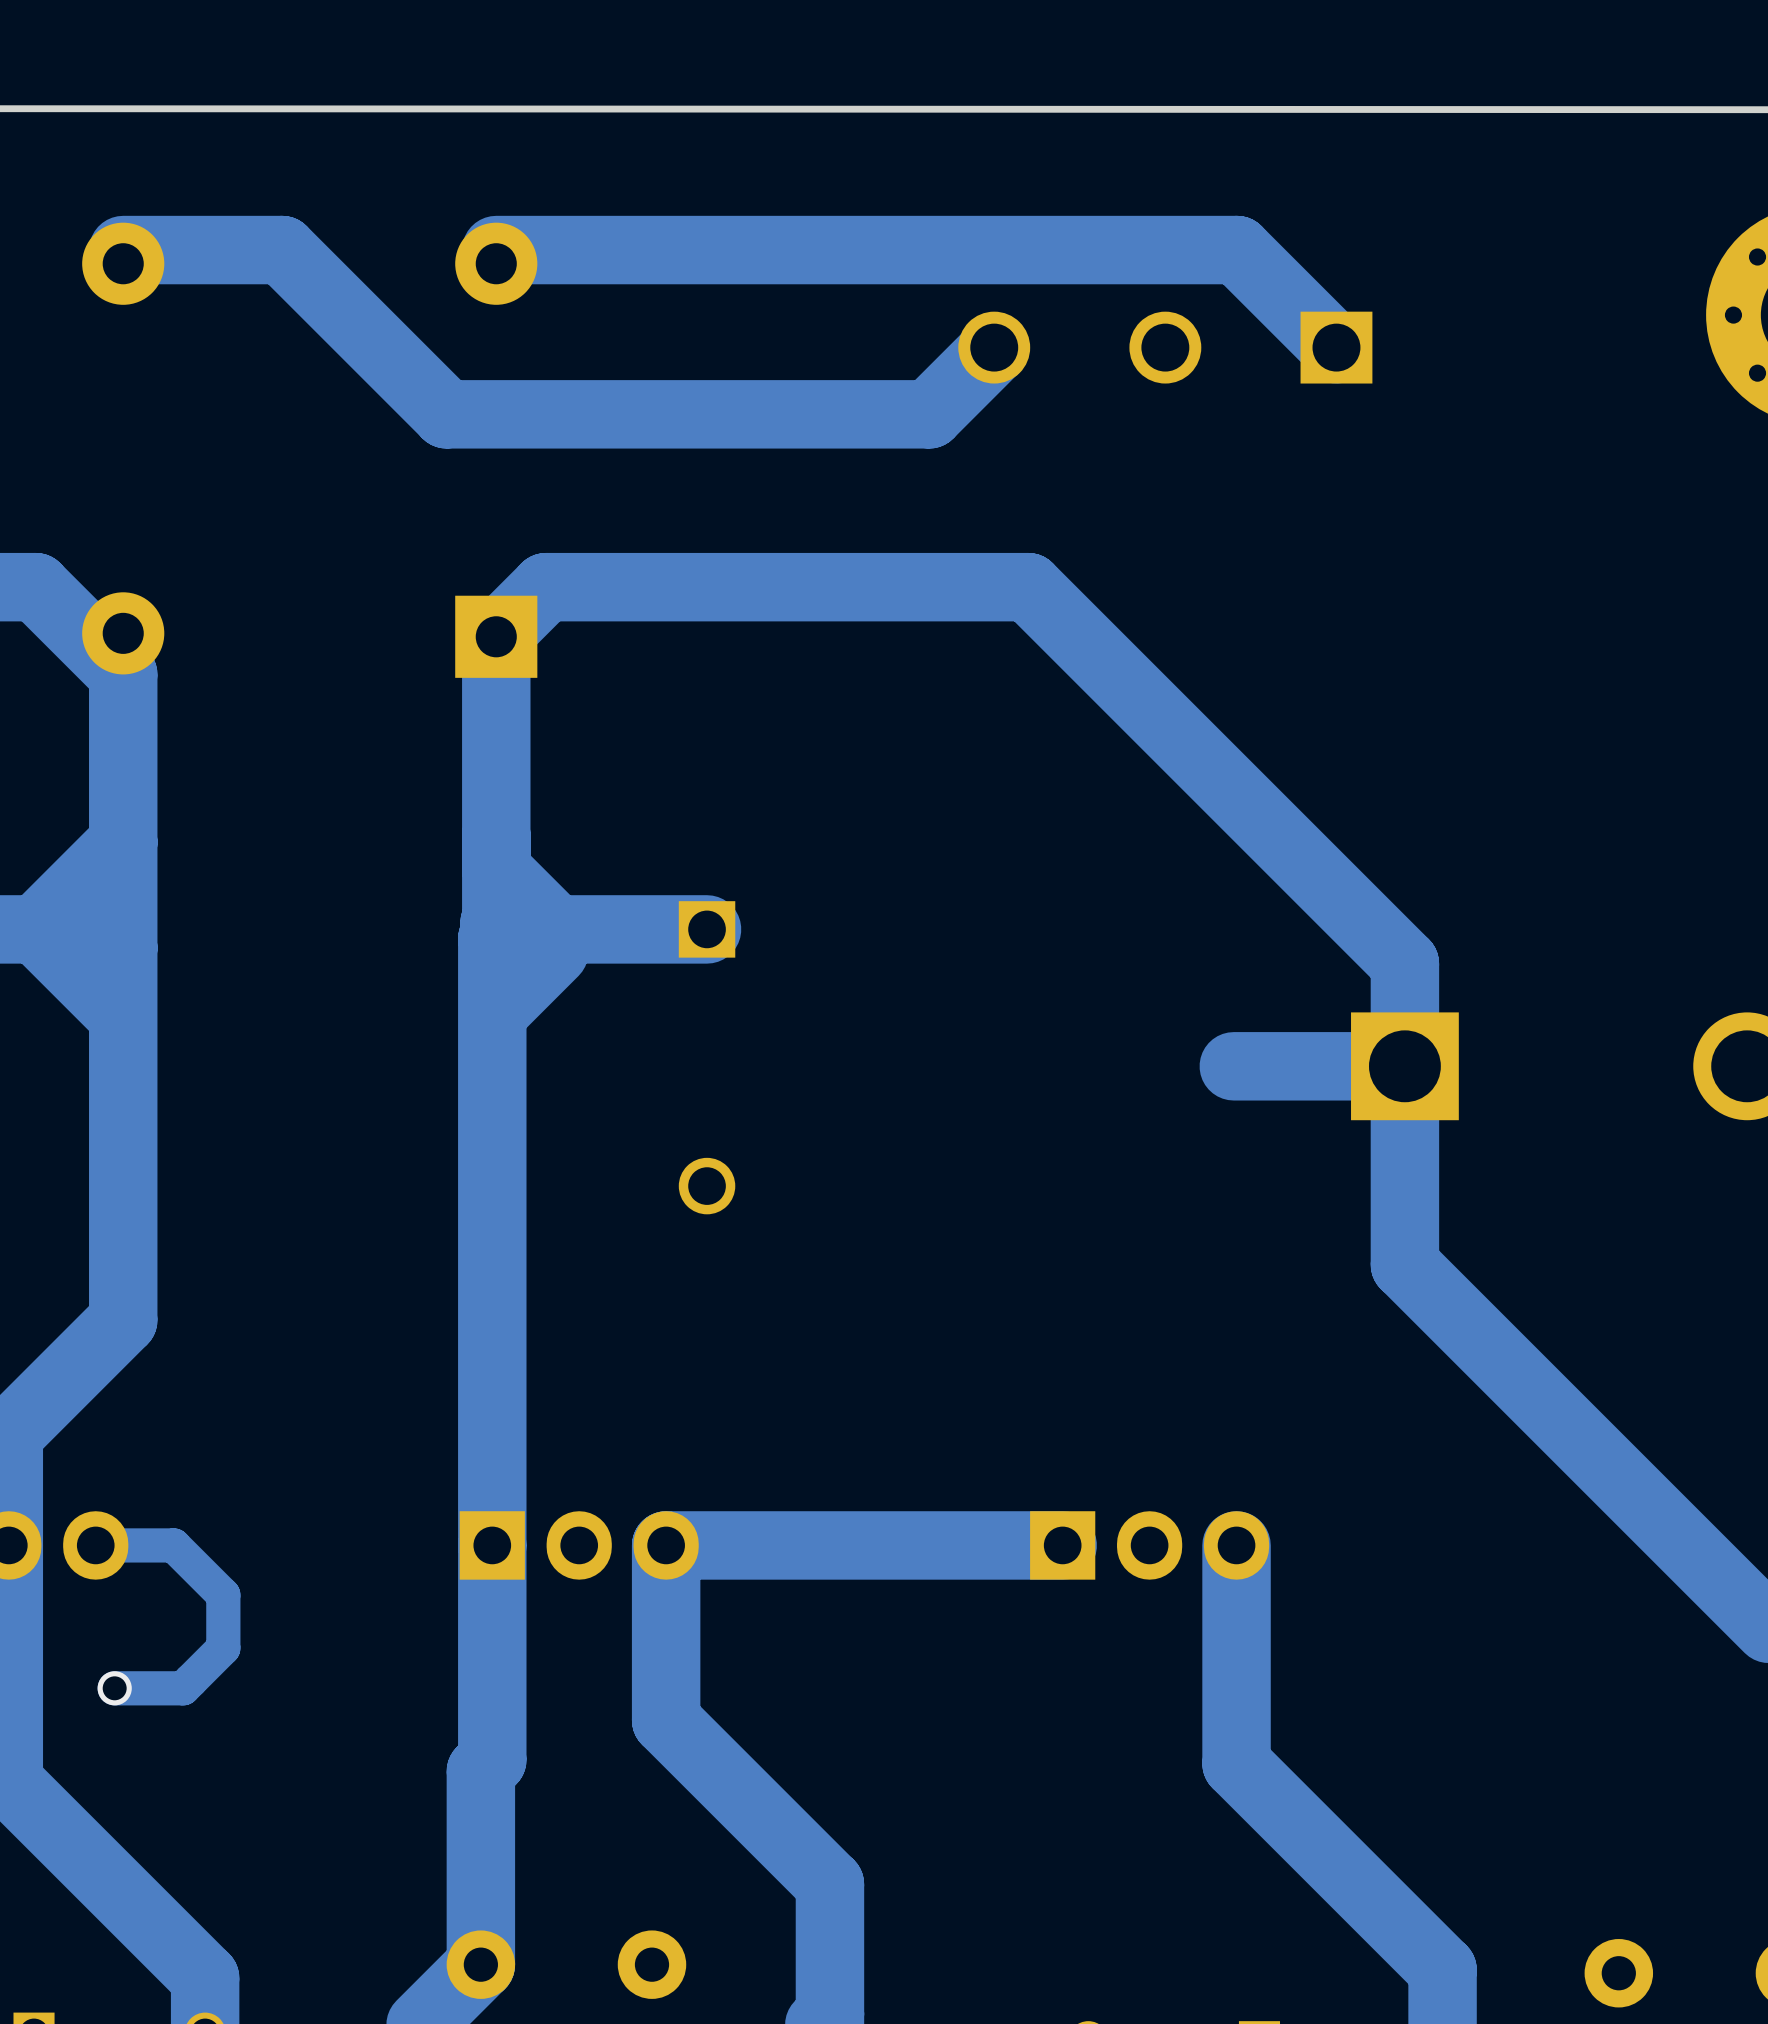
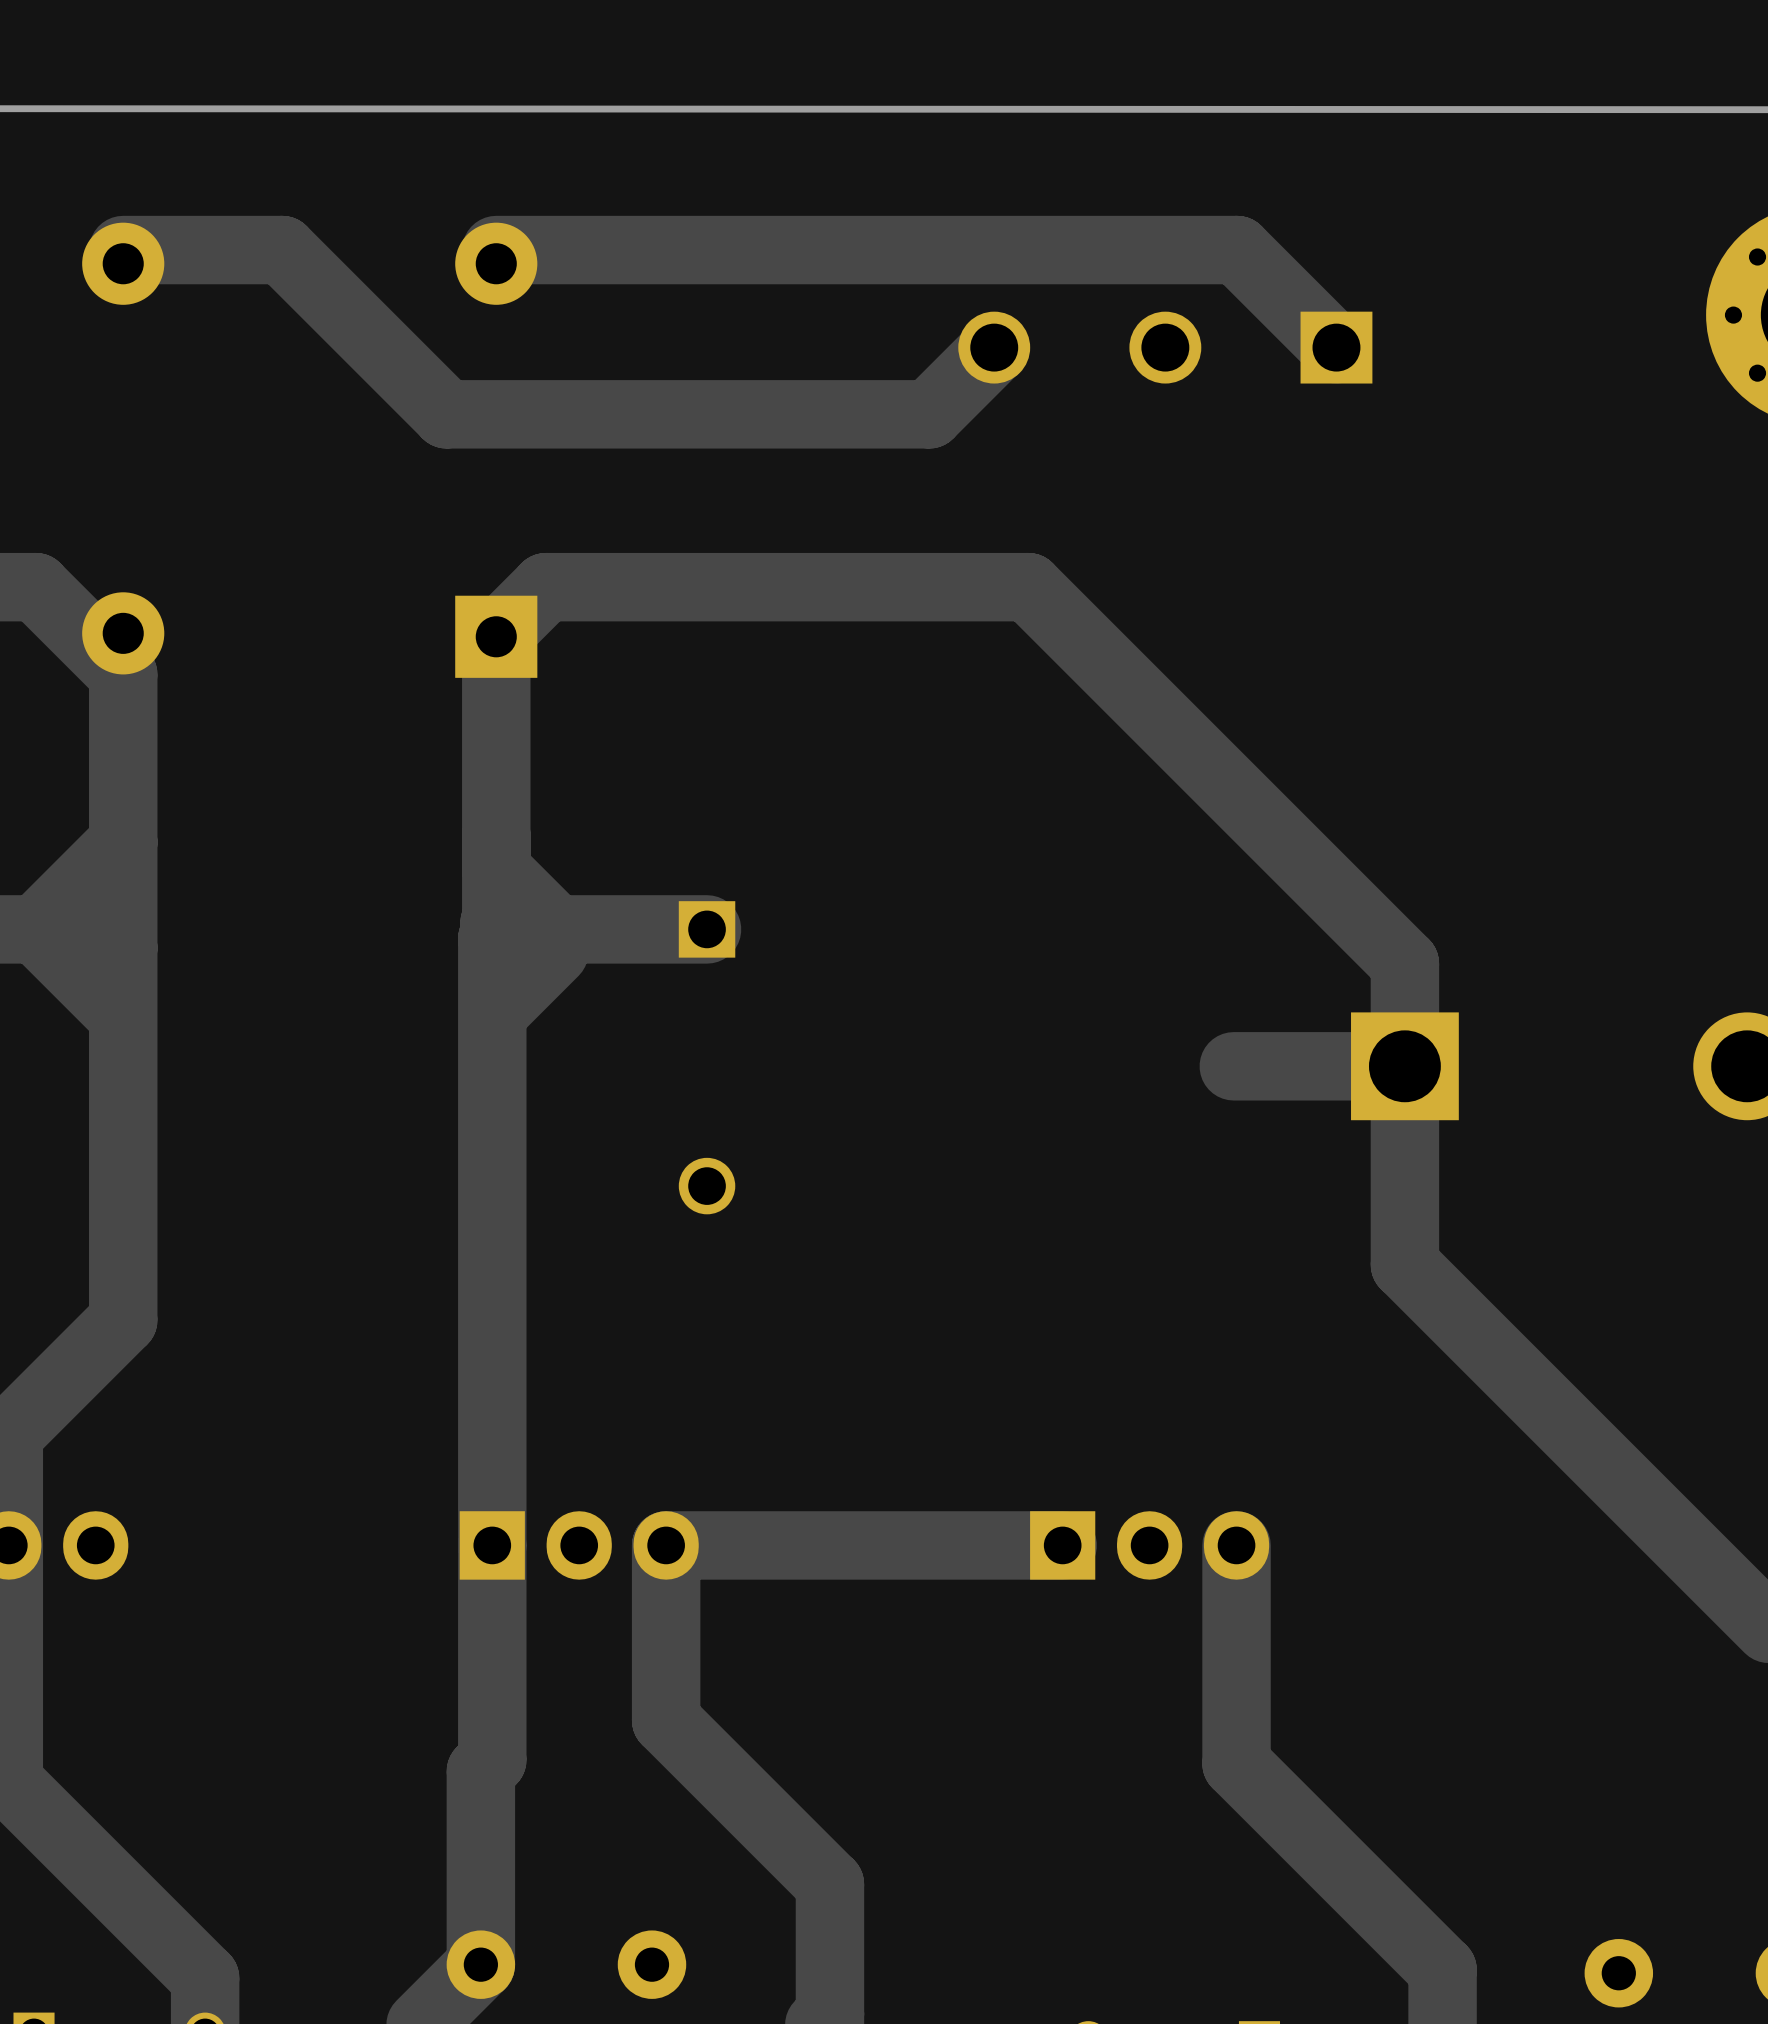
track: (95, 1545) (173, 1545) (223, 1595) (223, 1648) (183, 1688) (114, 1688) -> none
via: (114, 1688) -> none

